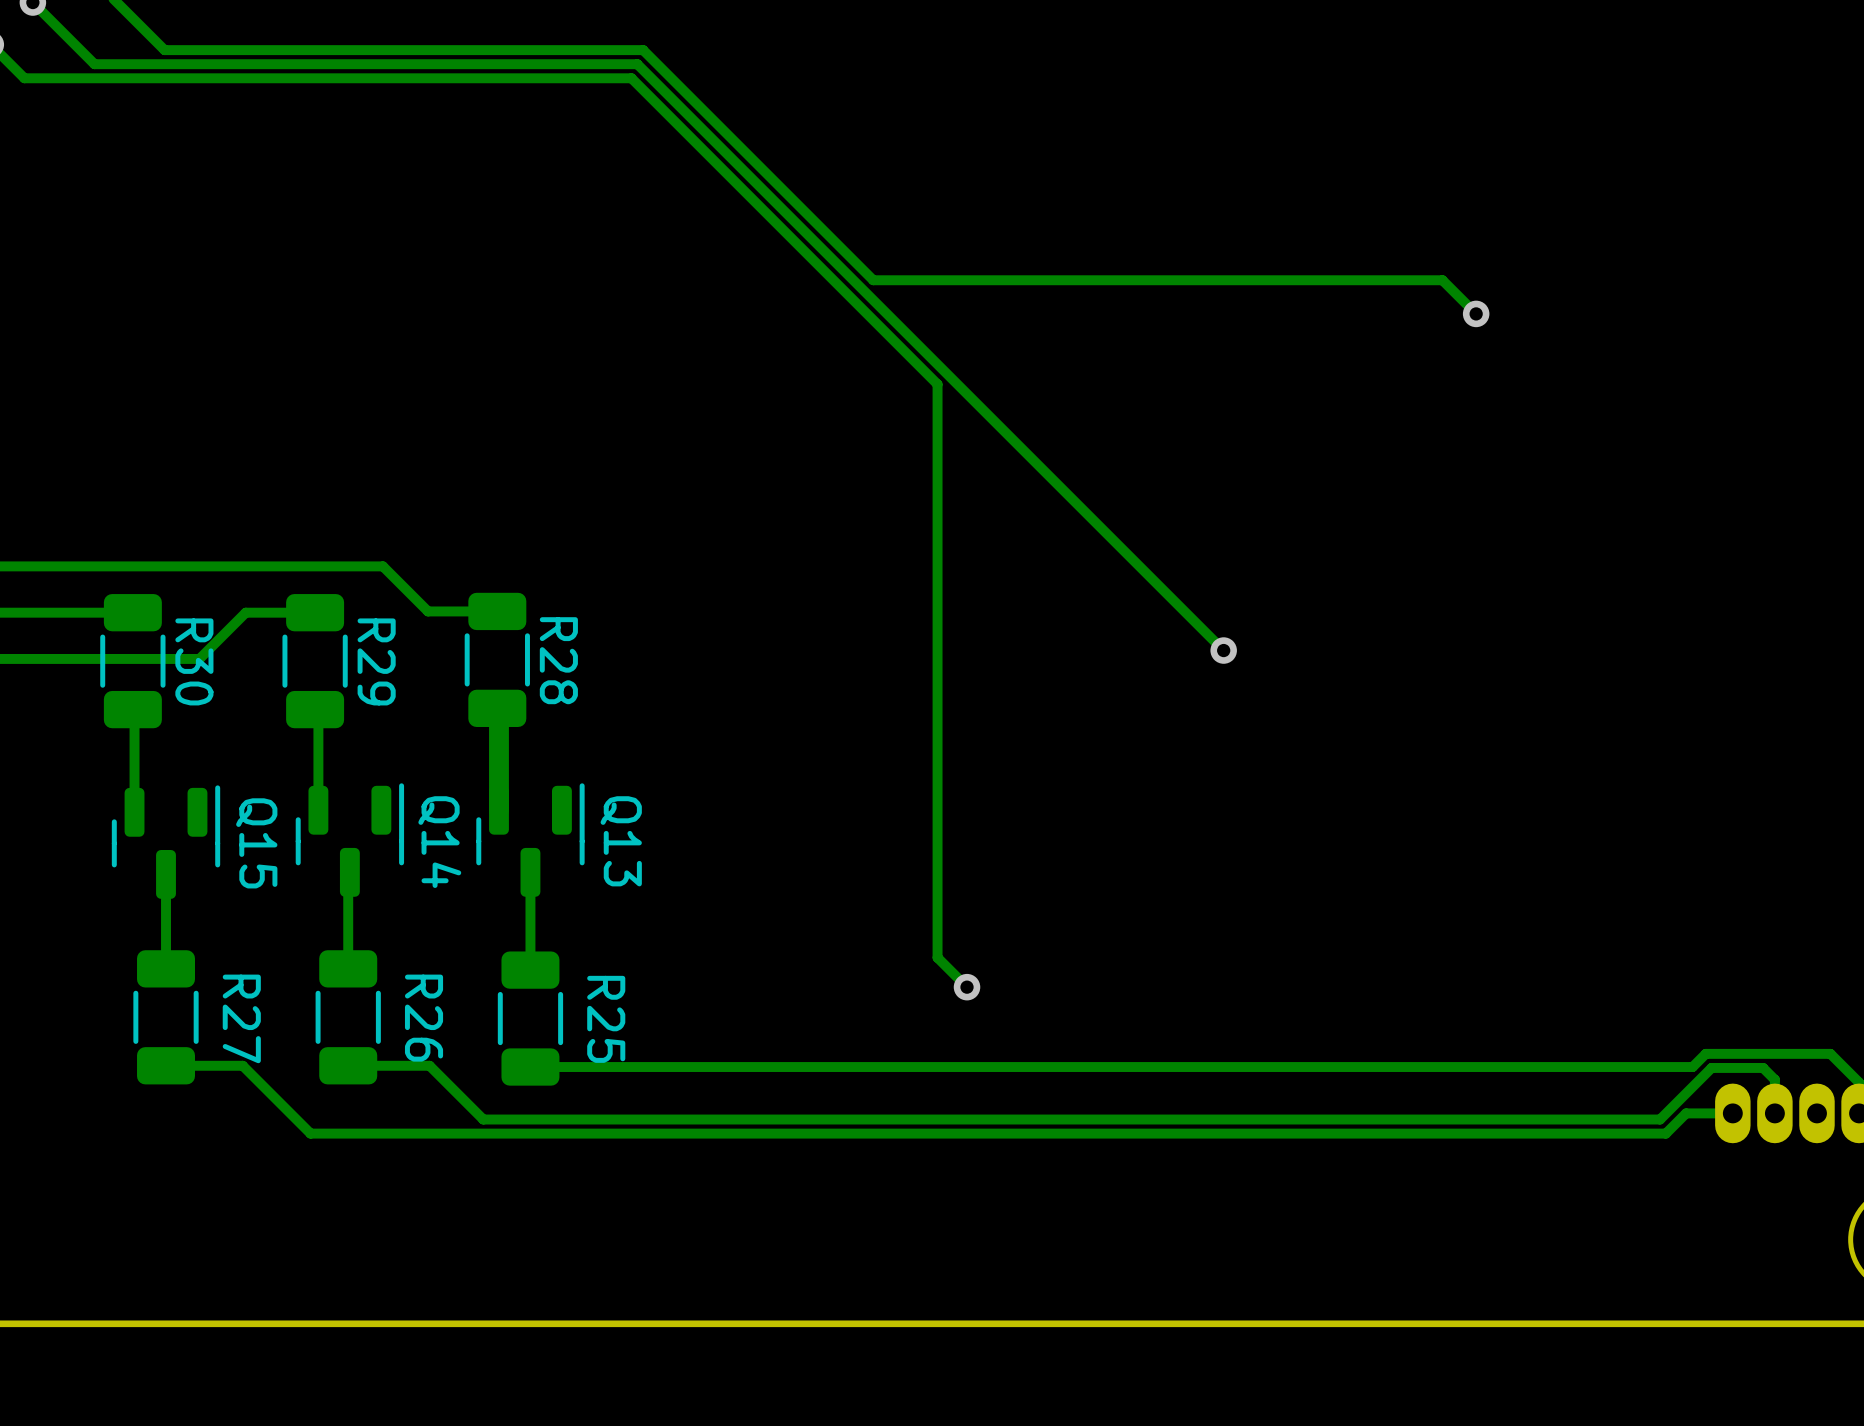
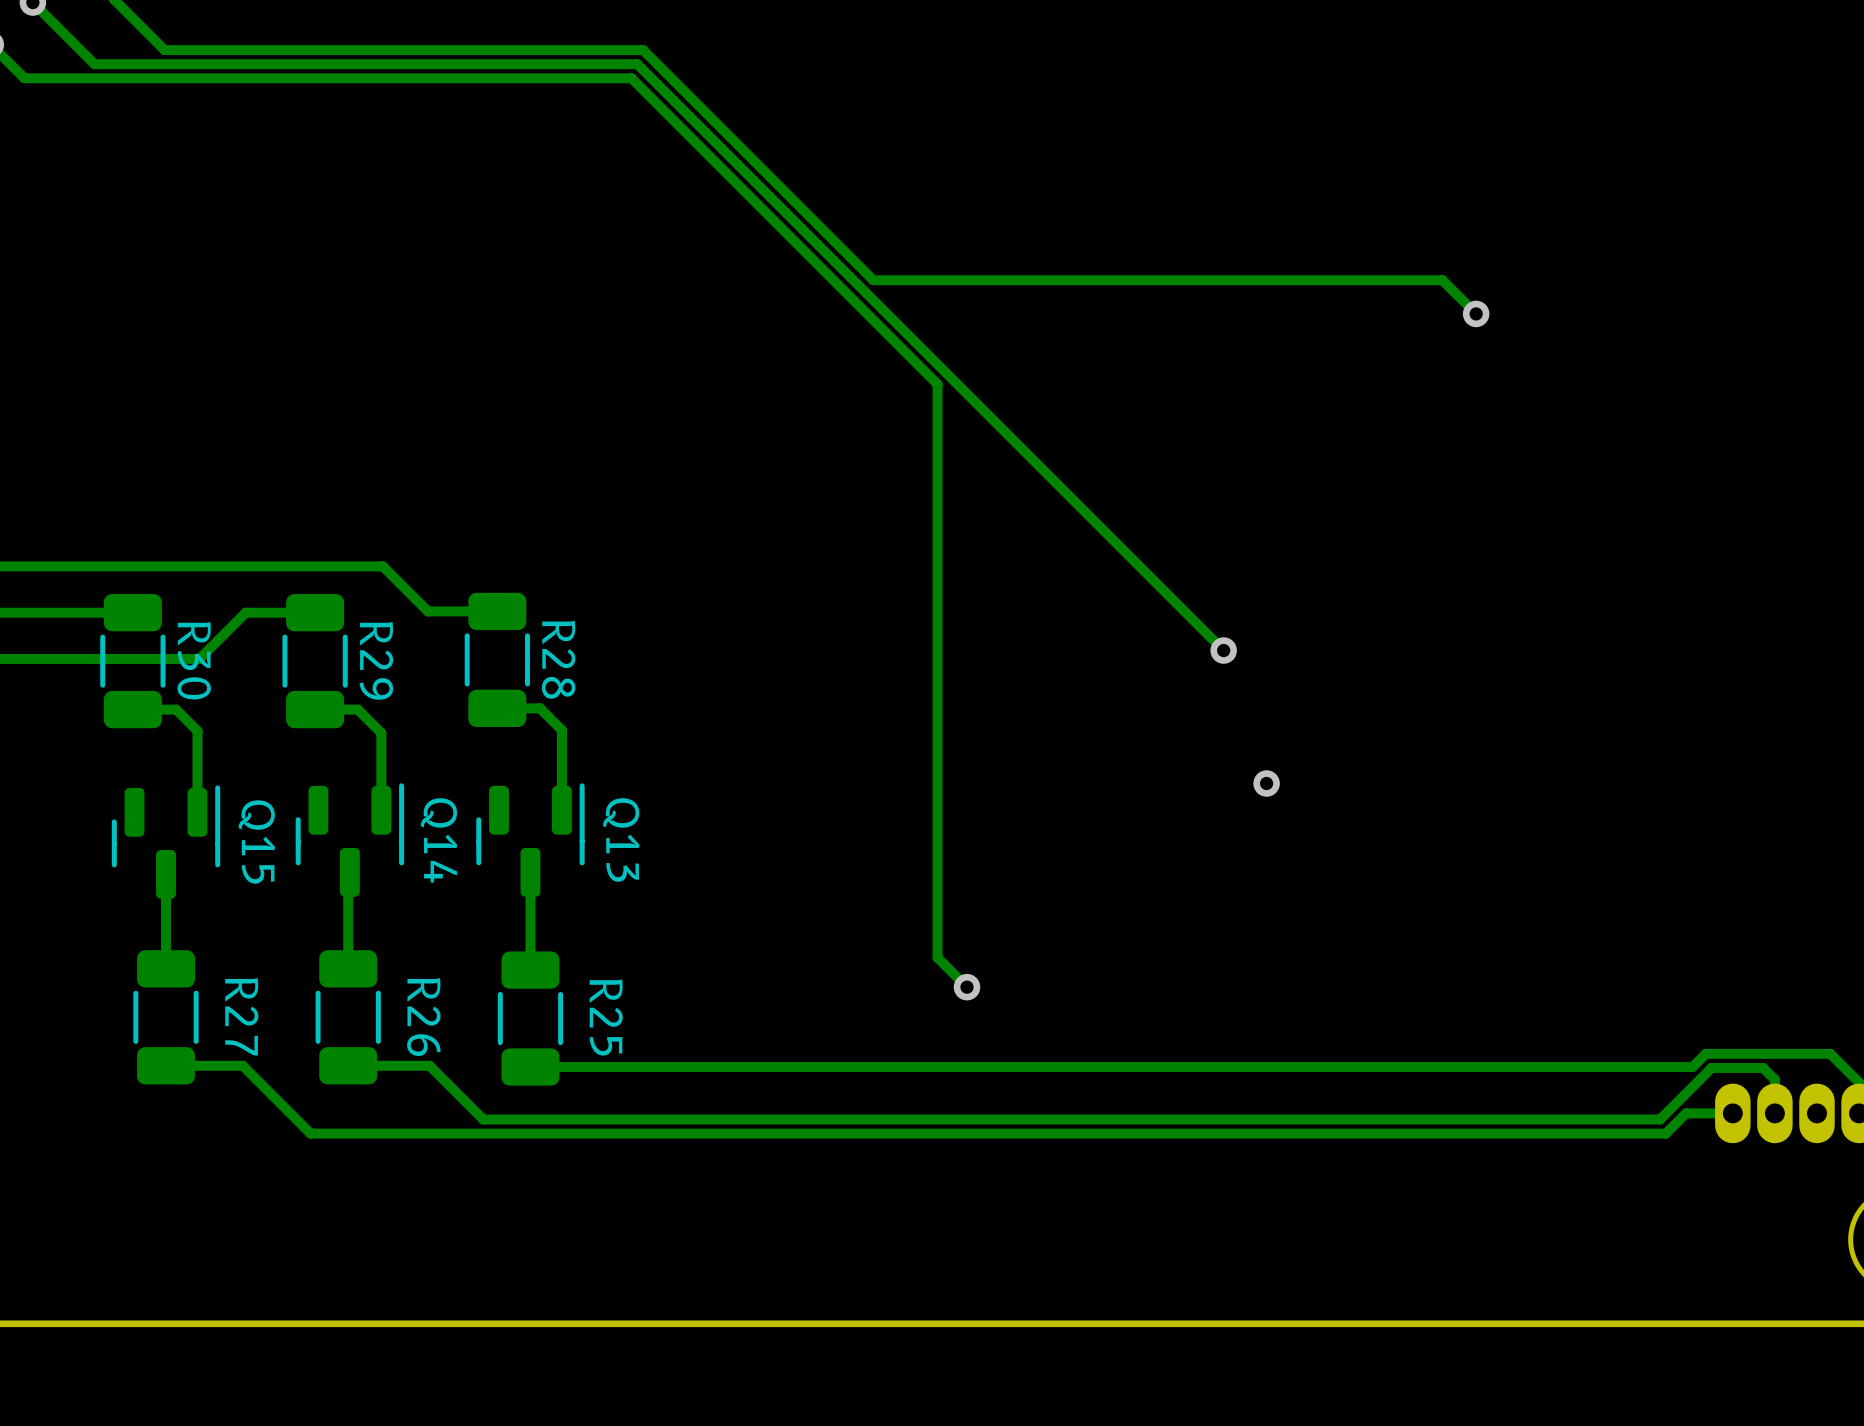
track: (497, 708) (498, 710) (498, 810) -> (497, 708) (540, 708) (561, 730) (561, 810)
track: (132, 709) (134, 711) (134, 812) -> (132, 709) (176, 709) (197, 730) (197, 812)
track: (315, 709) (318, 712) (318, 810) -> (315, 709) (357, 709) (381, 733) (381, 810)
via: none -> (1266, 783)

